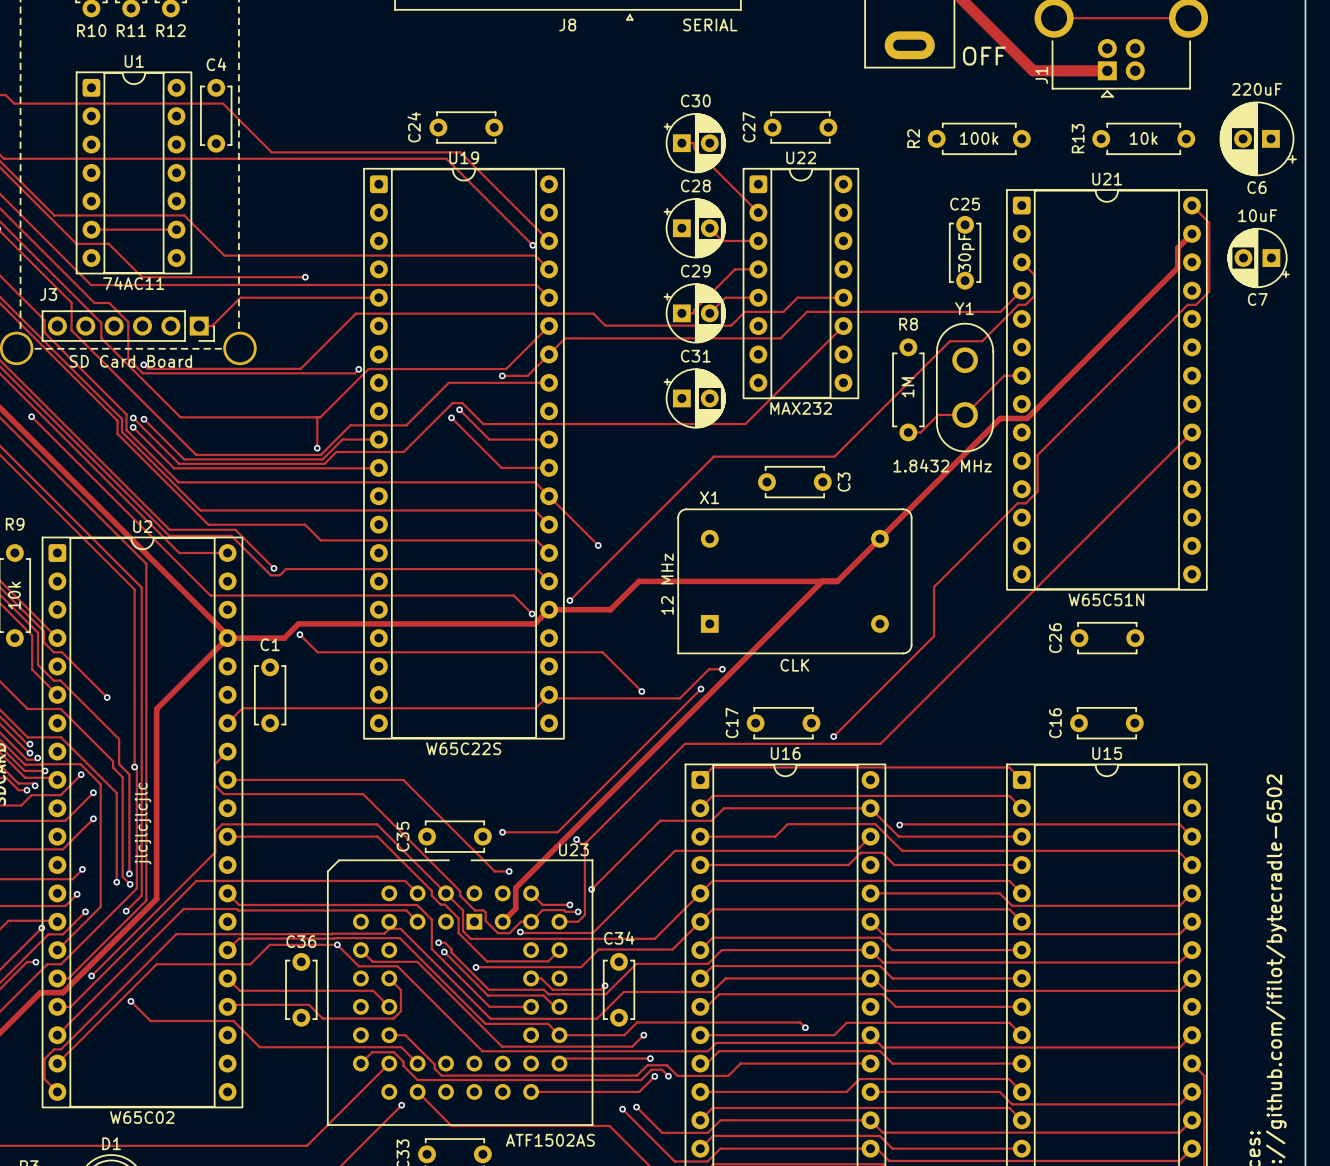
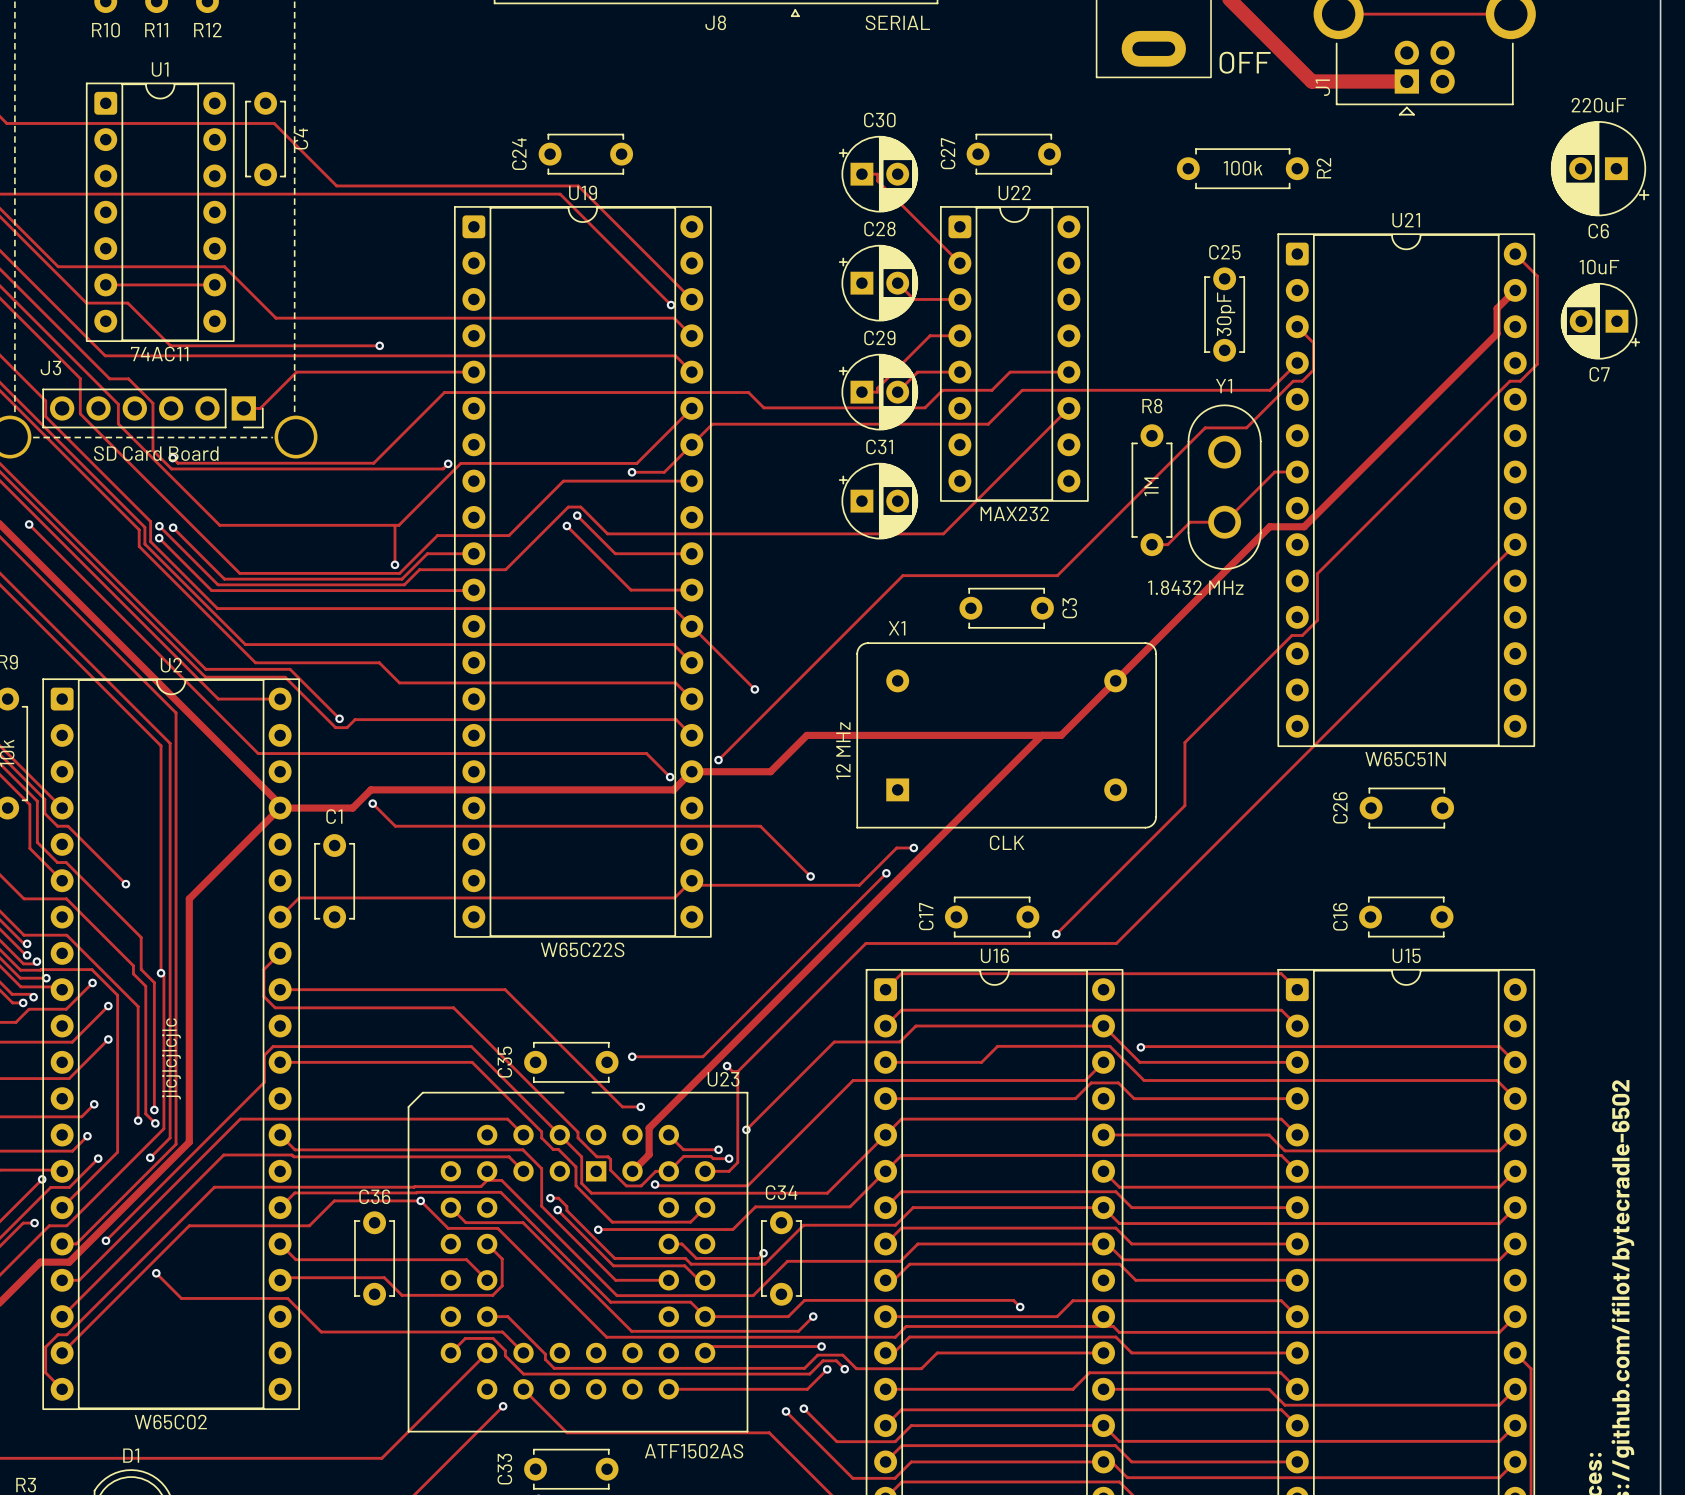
C4 name rotation: 0° (216, 64) -> 90° counterclockwise (300, 138)
C4 name position: C4 (216, 64) -> C4 (300, 138)
R2 name position: R2 (913, 138) -> R2 (1323, 168)
R13: 10k (1143, 138) -> none

